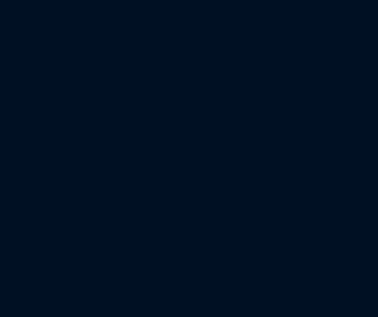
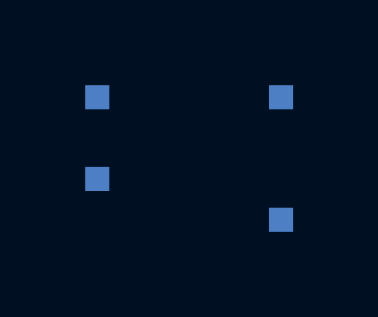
part: none -> (97, 97)
part: none -> (281, 97)
part: none -> (97, 178)
part: none -> (281, 219)

